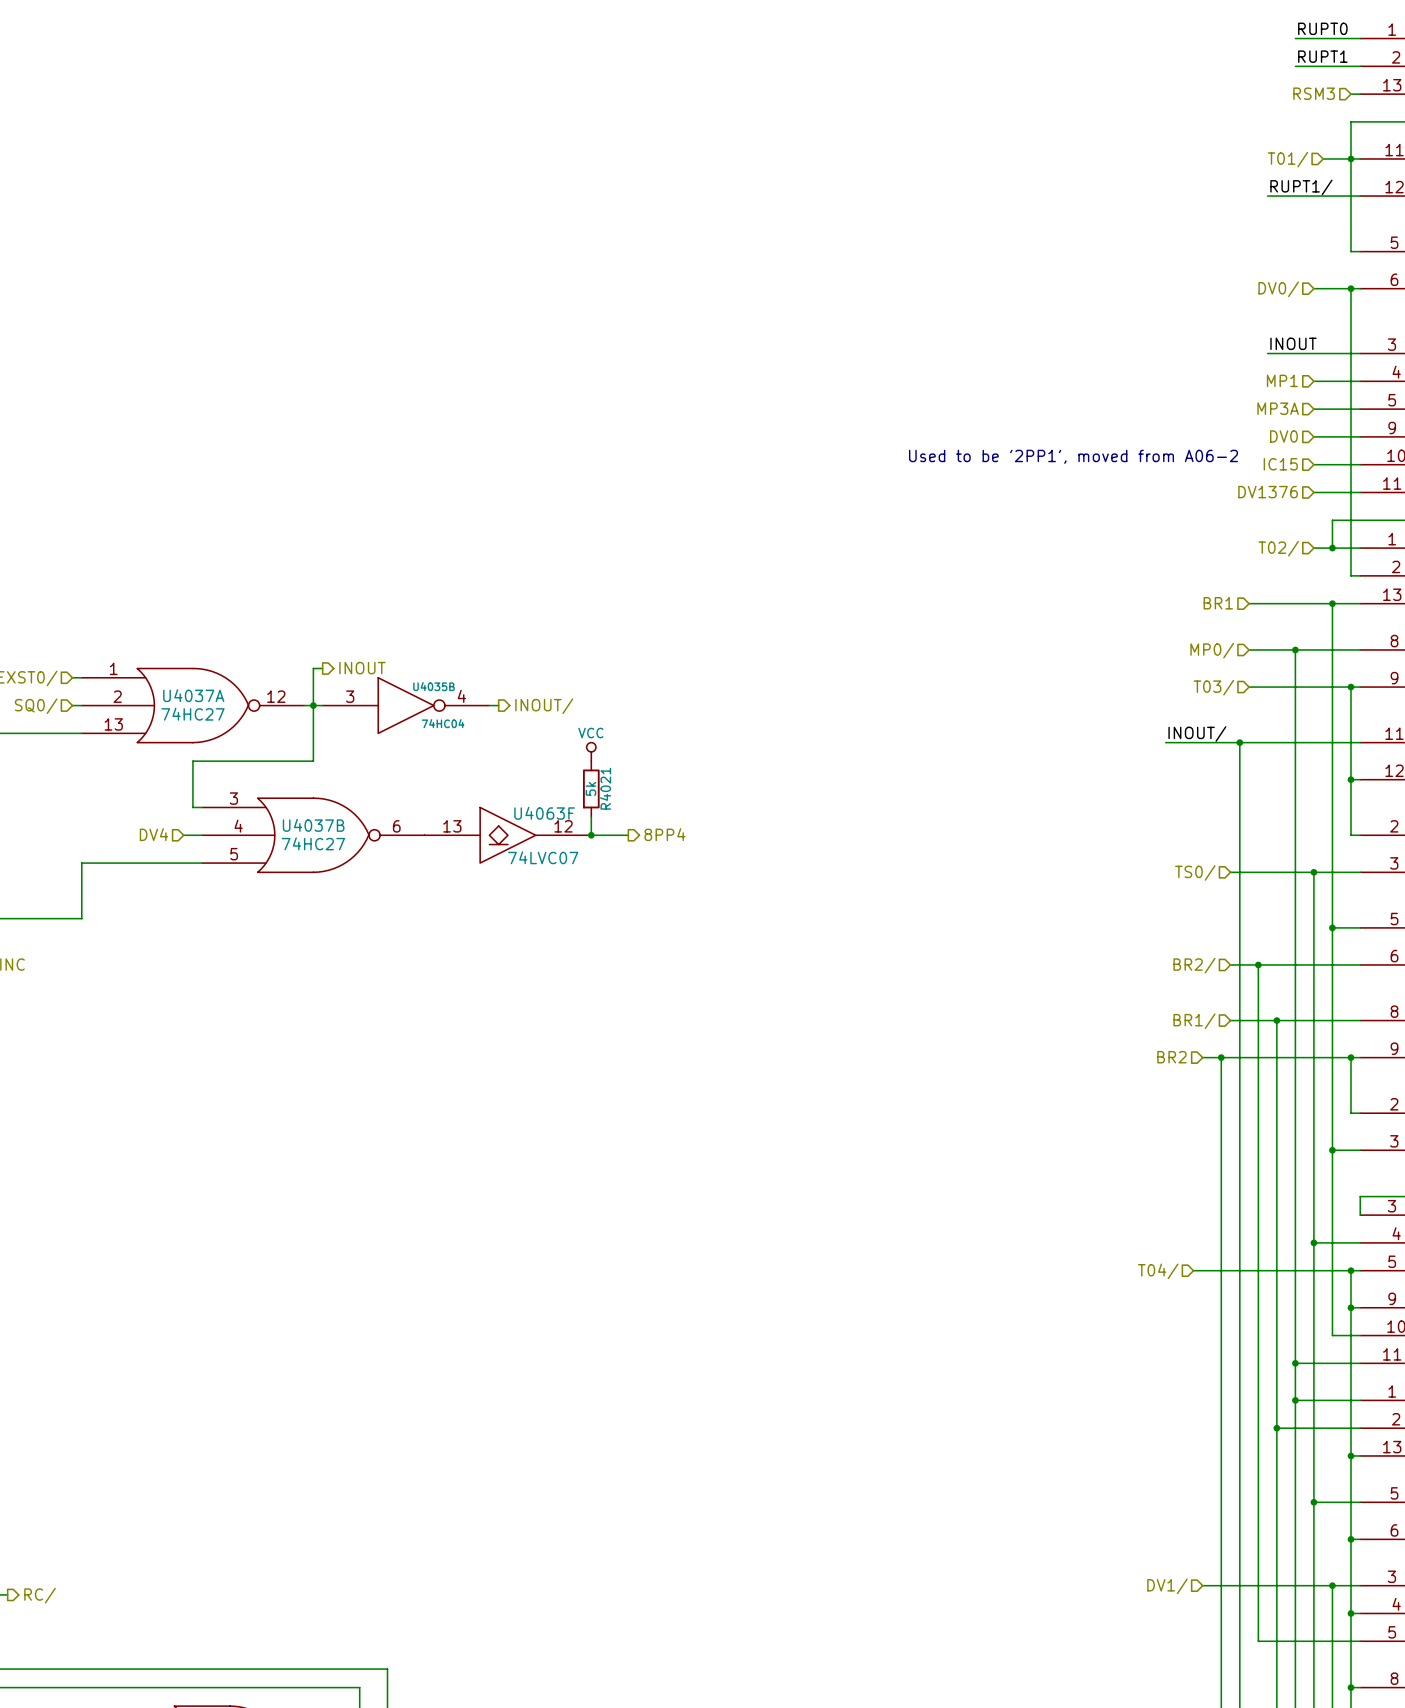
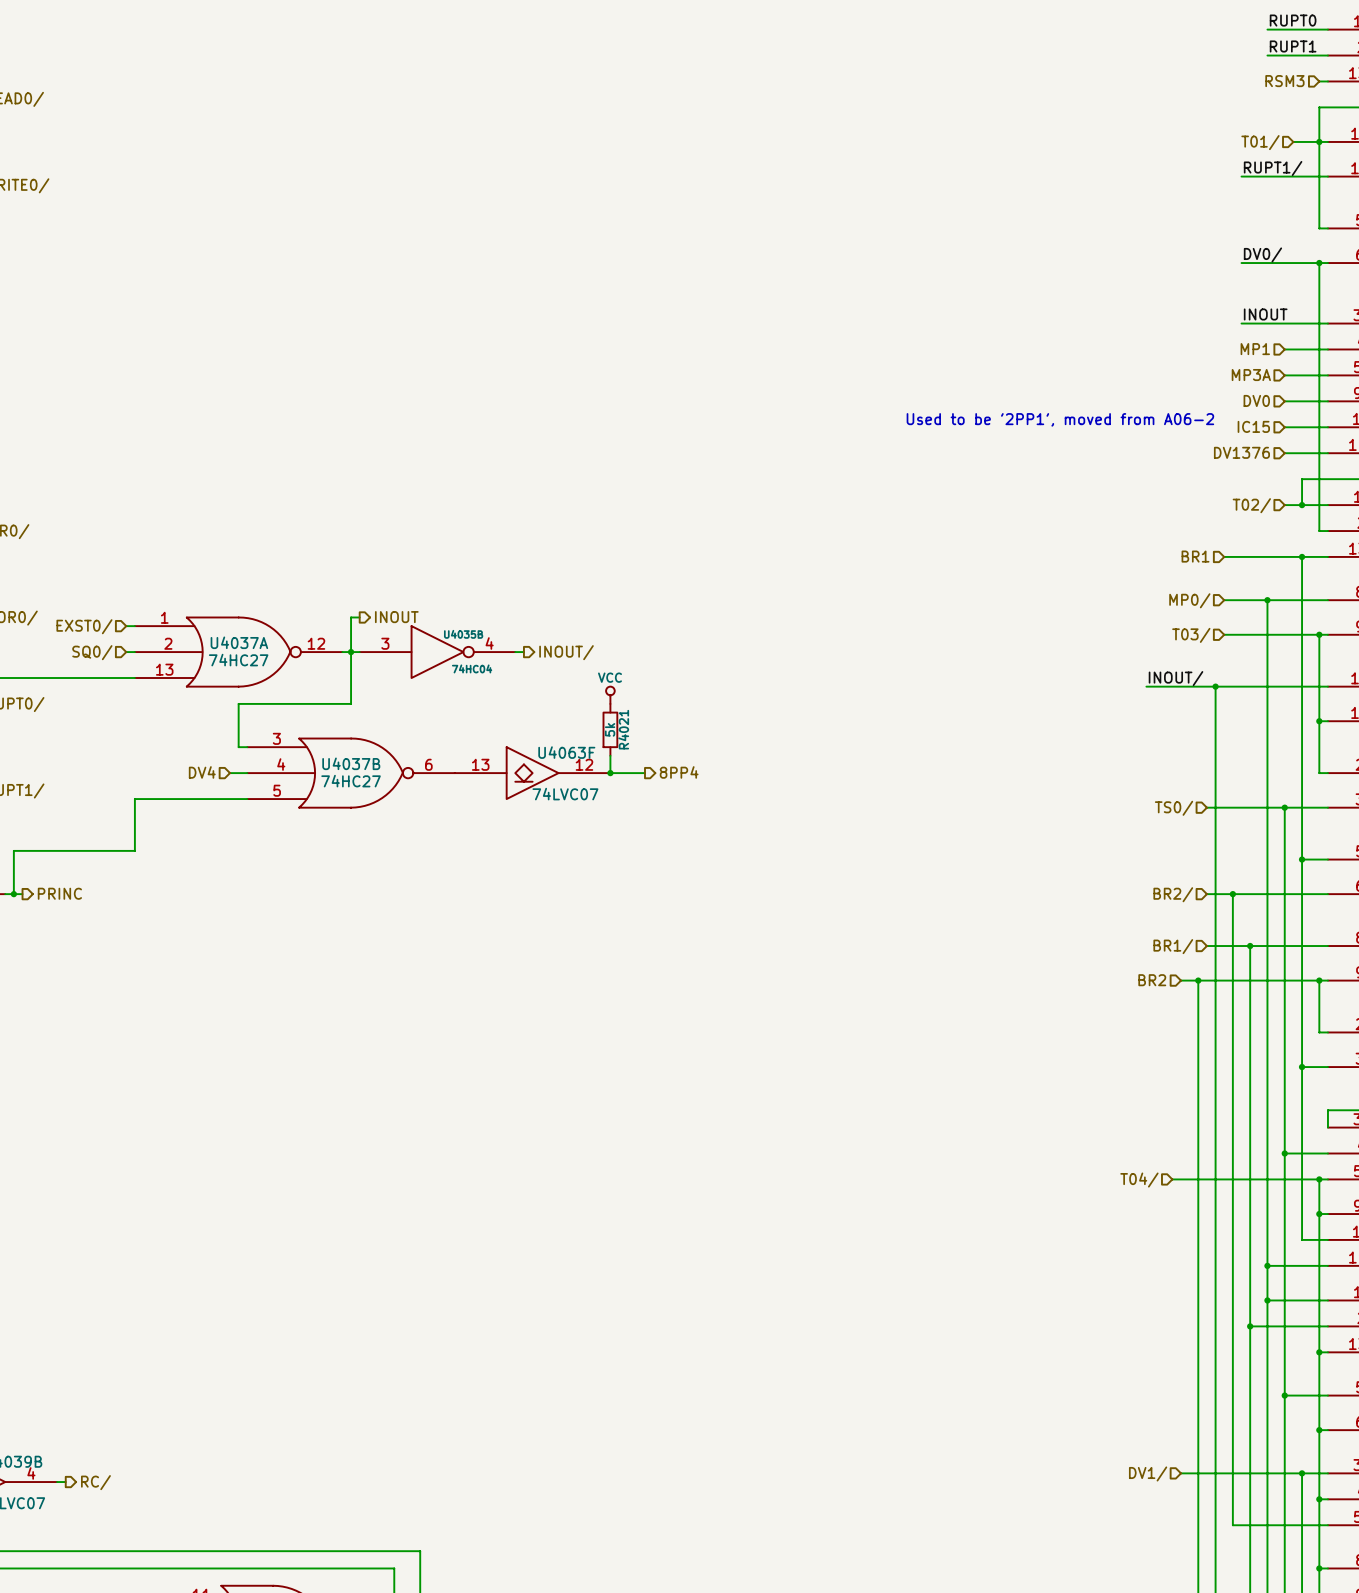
label: none -> DV0/ (1262, 254)
wire: none -> (1241, 263) (1284, 263)
hierarchical label: DV0/ (1278, 289) -> none

